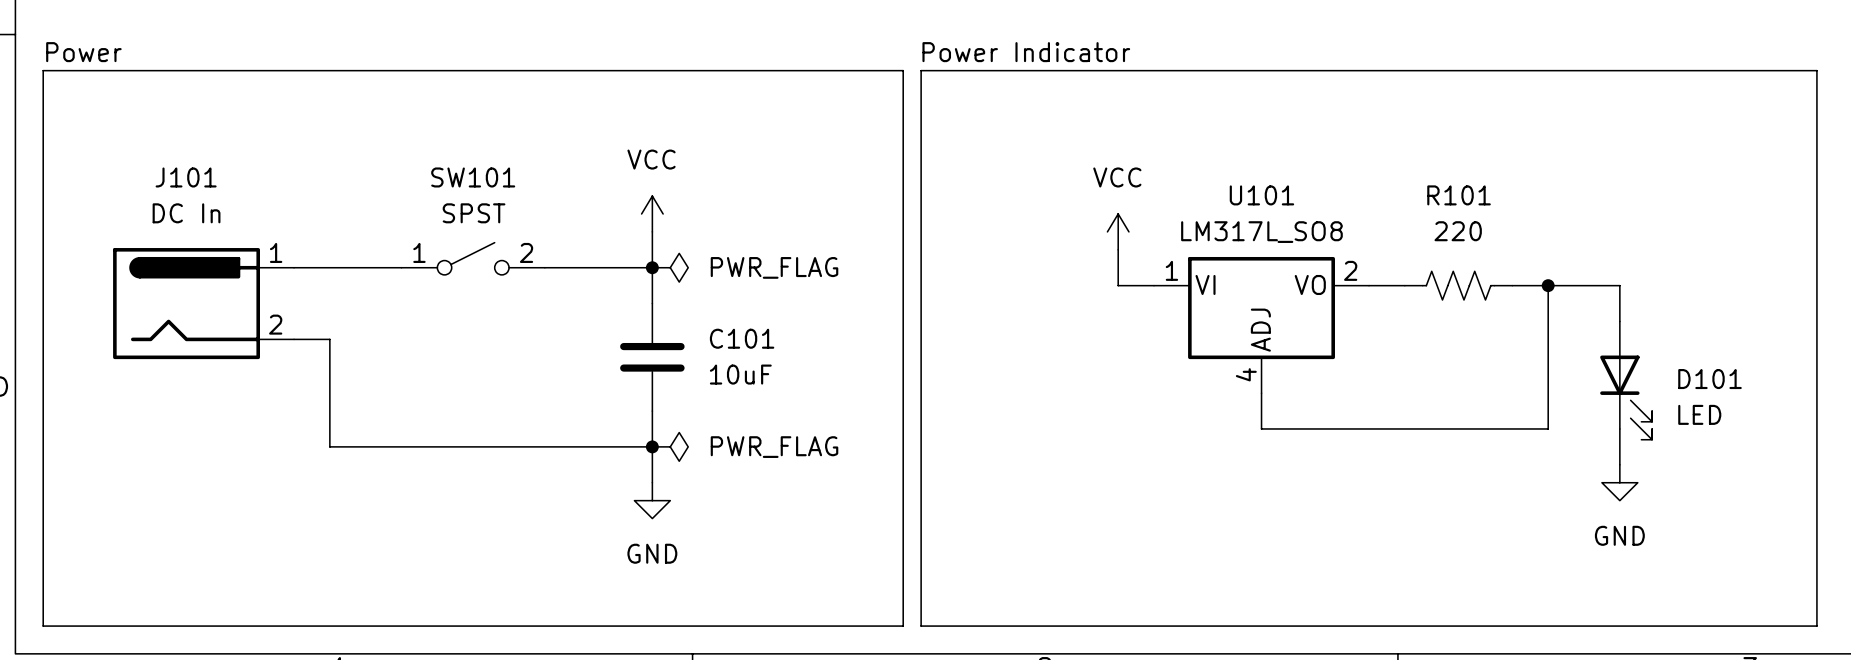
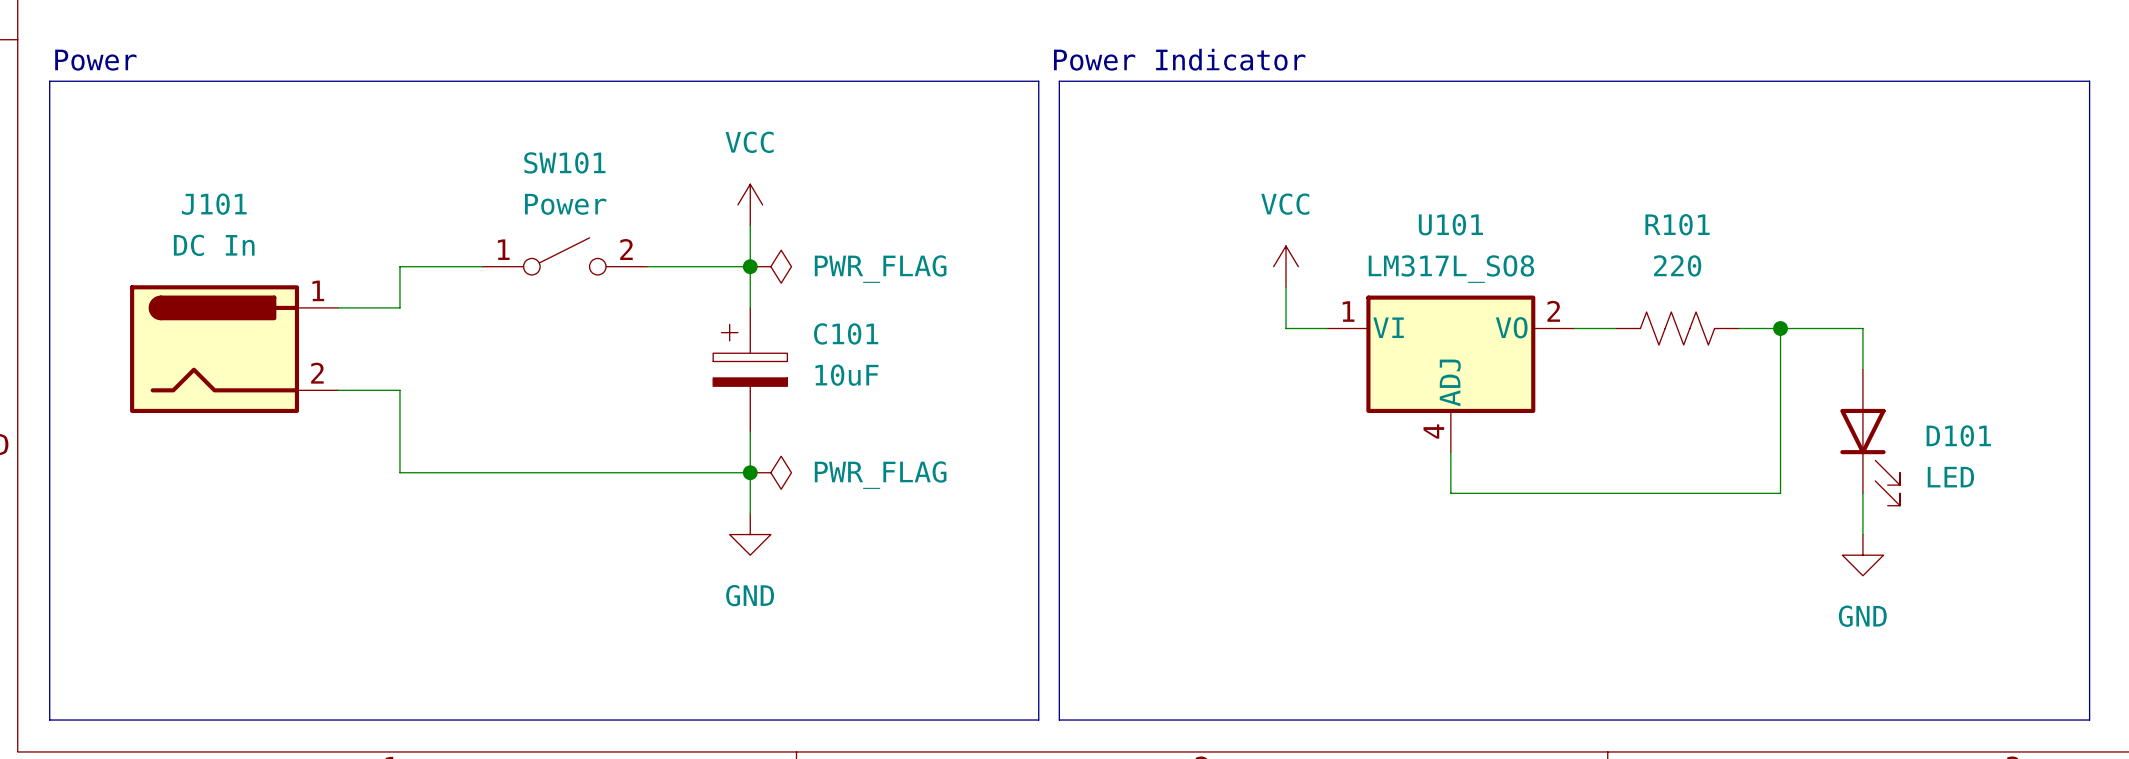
wire: none -> (750, 225) (750, 266) (647, 266)
SW101 value: SPST (474, 213) -> Power (565, 204)
power symbol position: VCC (652, 213) -> VCC (750, 204)
SW101 position: (473, 258) -> (564, 256)
wire: (347, 267) (401, 267) -> (399, 307) (399, 266) (482, 266)
wire: (544, 267) (652, 267) (652, 303) -> none
junction position: (652, 267) -> (750, 266)
power symbol position: PWR_FLAG (670, 267) -> PWR_FLAG (770, 266)
C101 symbol: [620, 303, 685, 412] -> [713, 307, 788, 432]
wire: (329, 339) (329, 446) (652, 446) (652, 482) -> (379, 390) (399, 390) (399, 472) (750, 472) (750, 431)
junction position: (652, 446) -> (750, 472)
power symbol position: PWR_FLAG (670, 446) -> PWR_FLAG (770, 472)
power symbol position: GND (652, 500) -> GND (750, 534)

